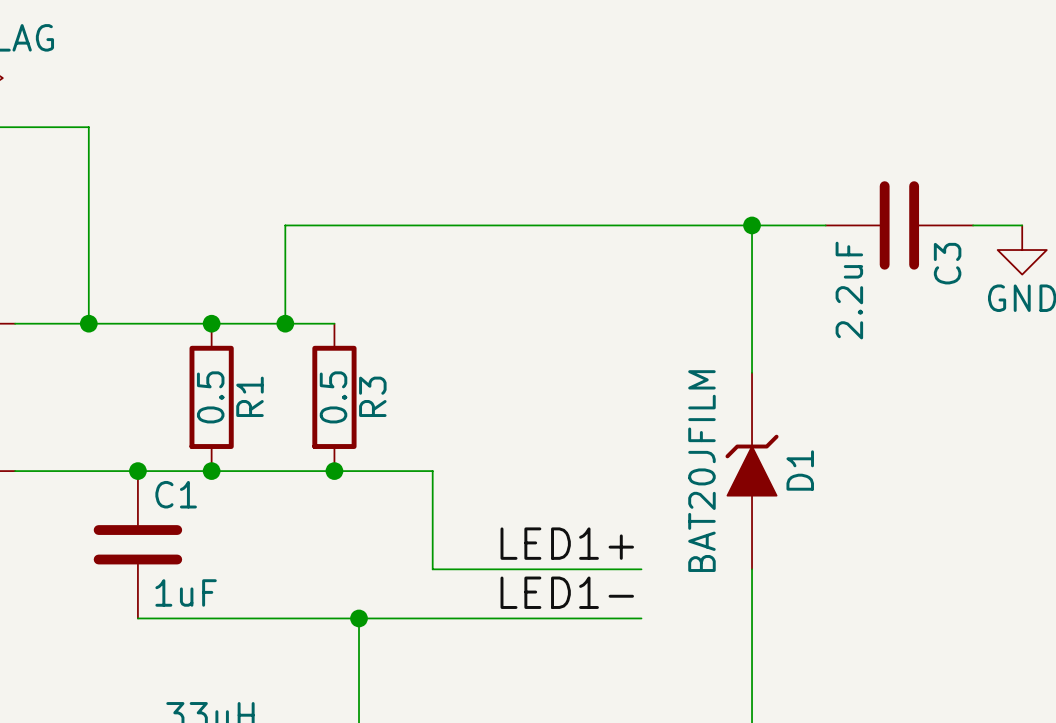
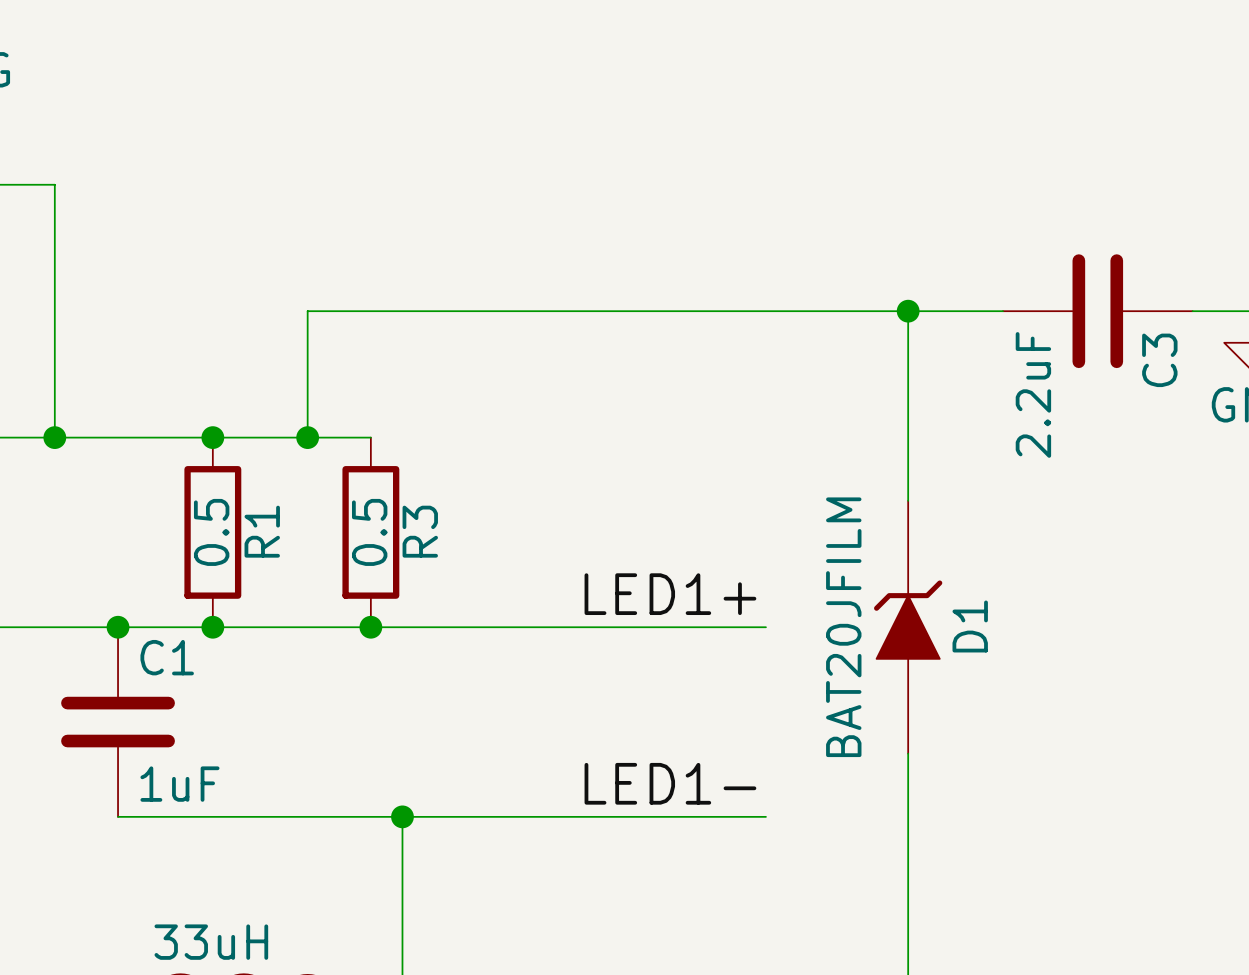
wire: (432, 471) (432, 569) (641, 569) -> (497, 627) (765, 627)
label position: LED1+ (567, 543) -> LED1+ (670, 594)

